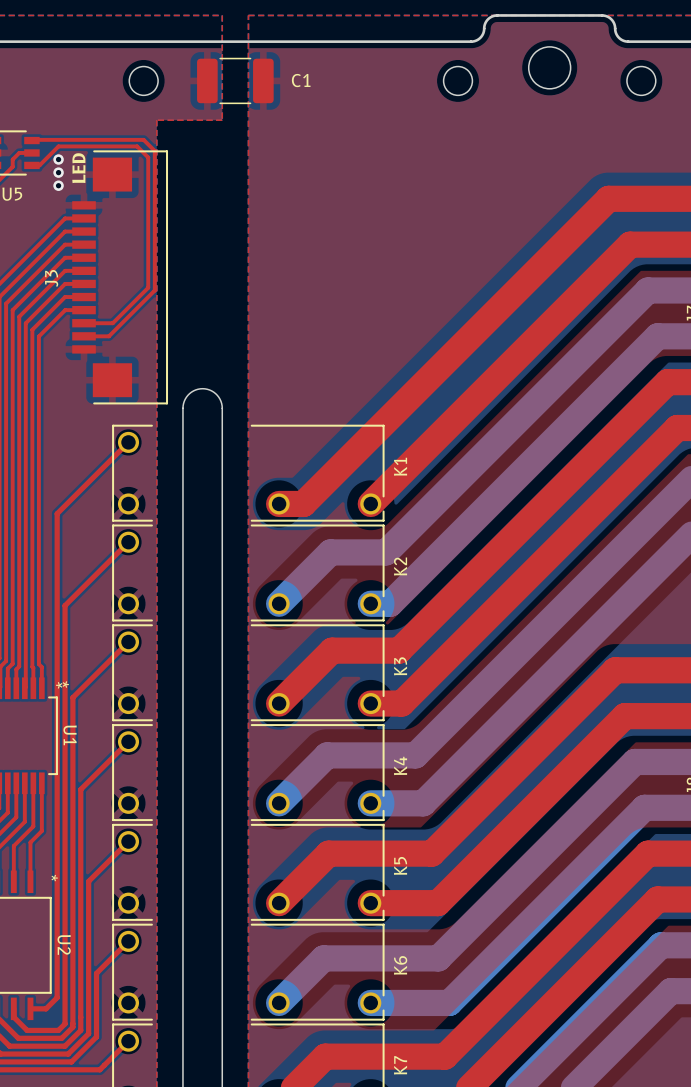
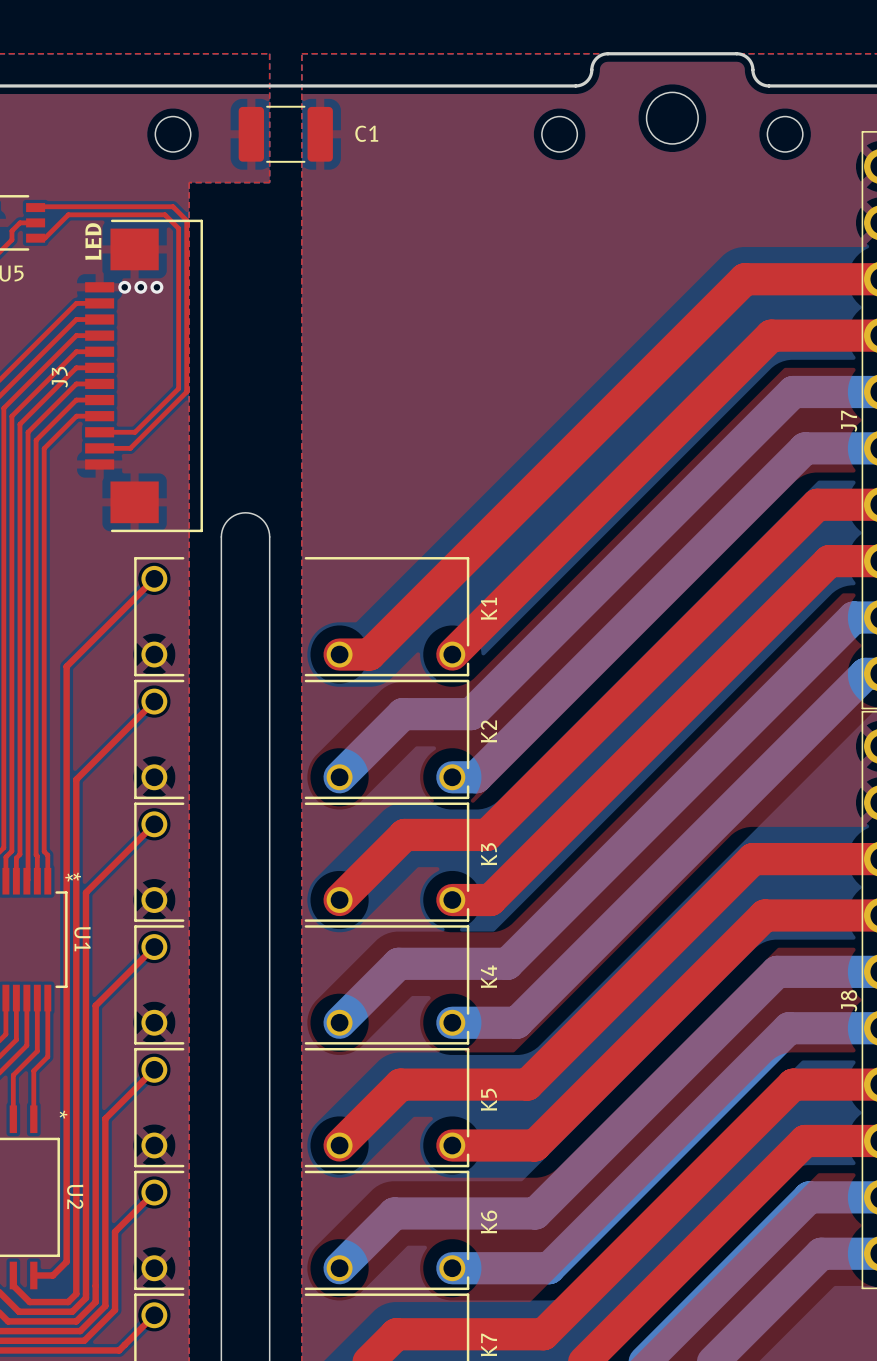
via: (58, 159) -> none
via: (58, 172) -> none
via: (58, 185) -> none
via: none -> (124, 287)
via: none -> (140, 287)
via: none -> (156, 287)

